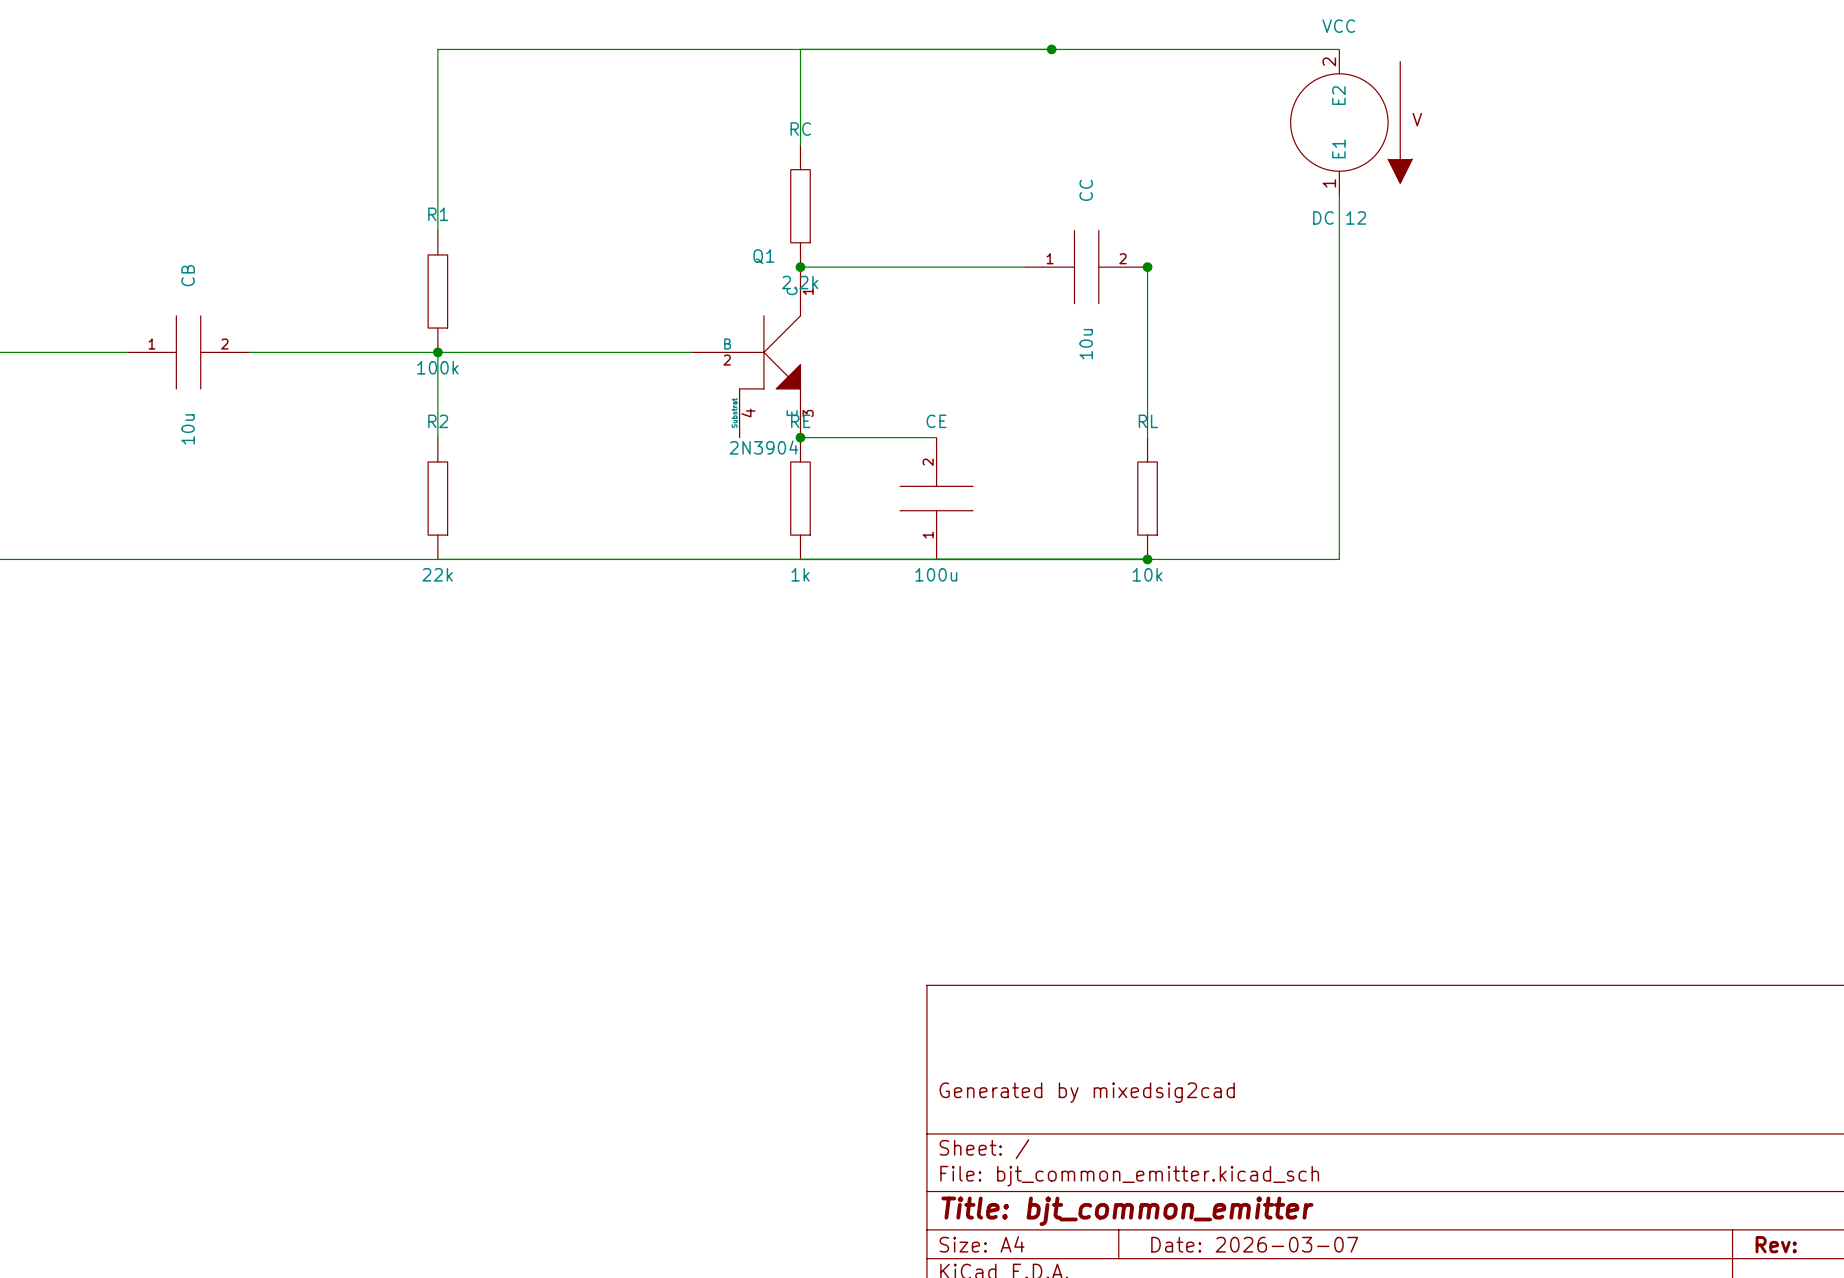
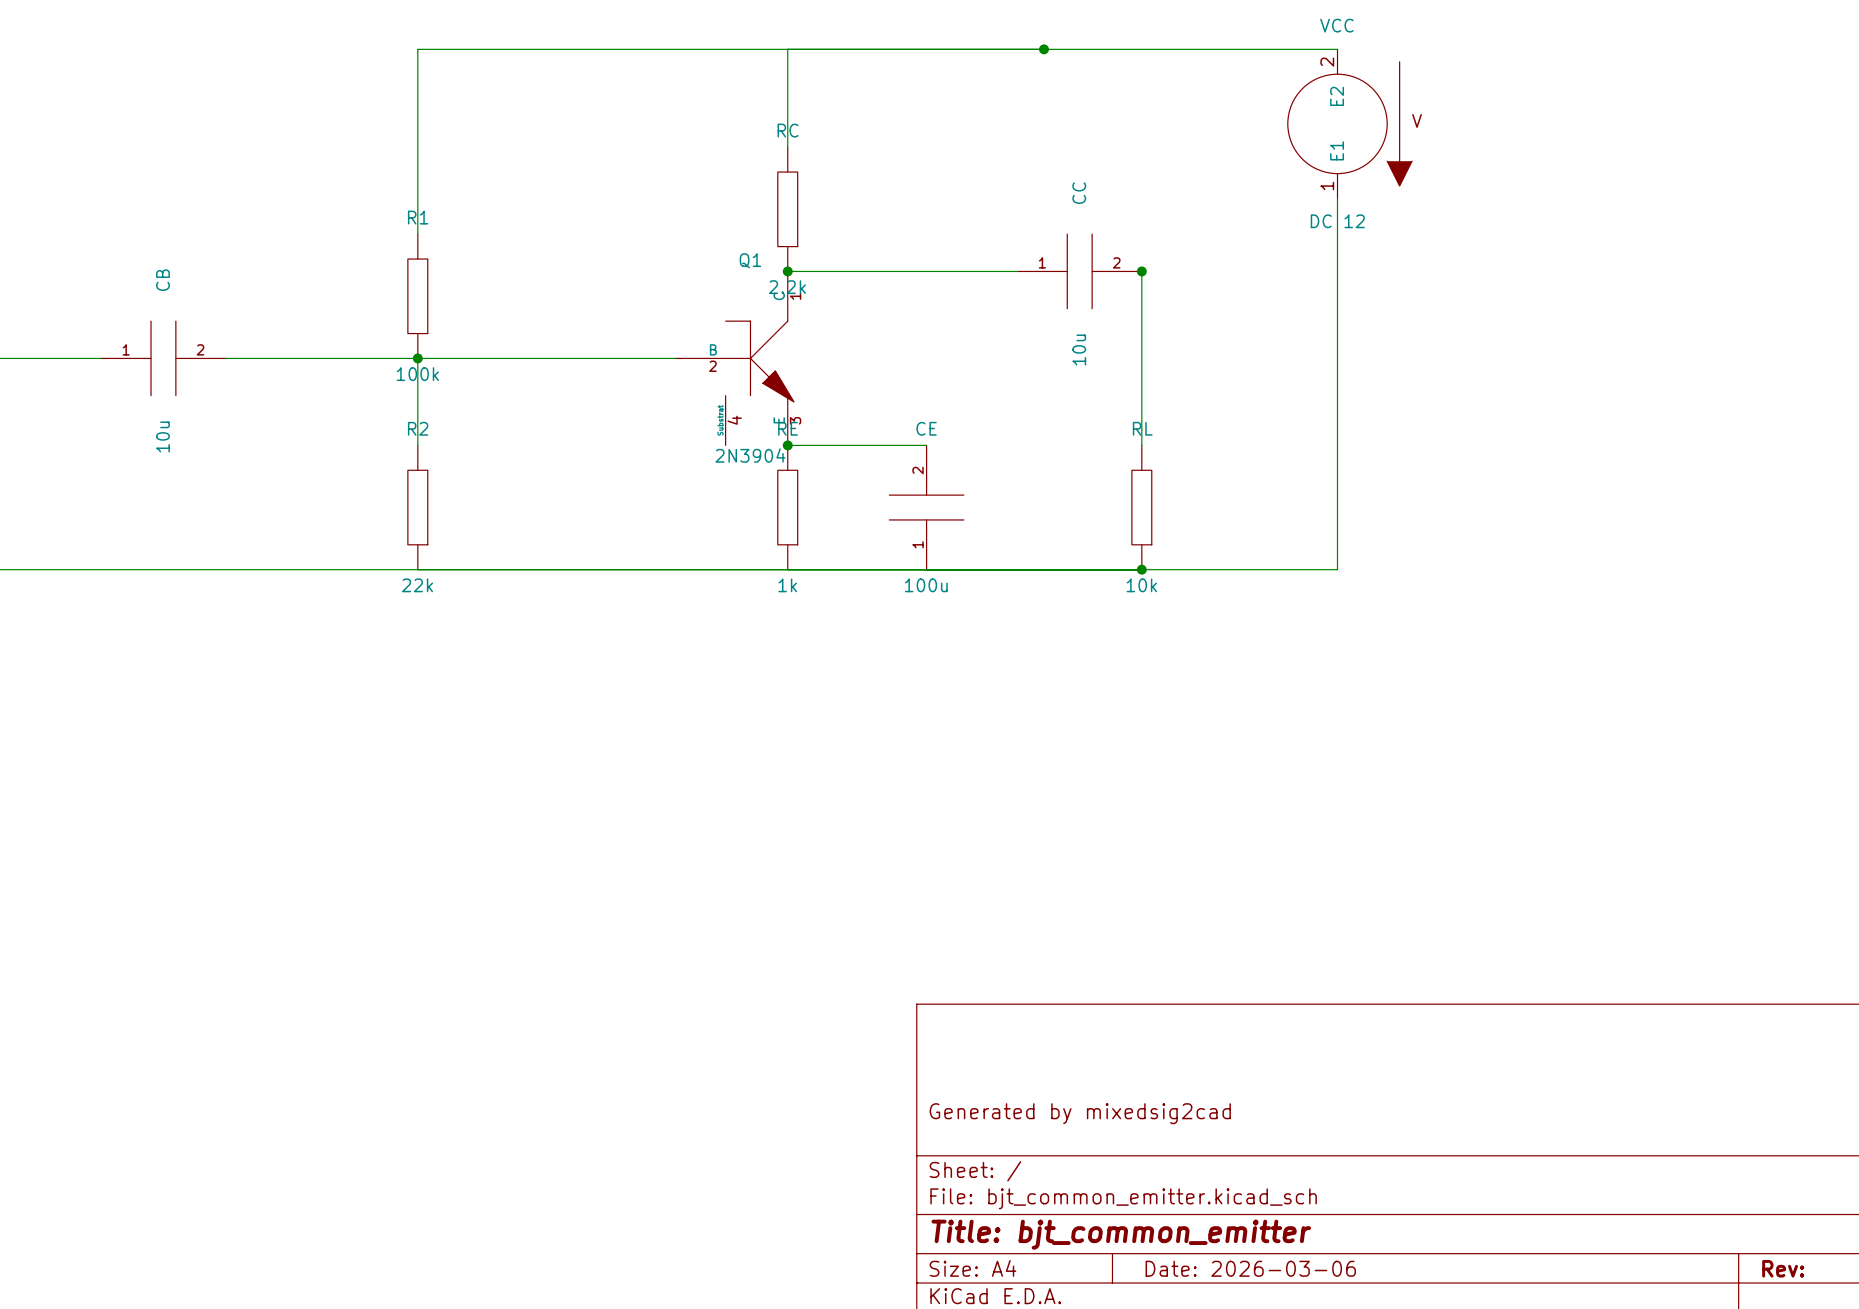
Q1 symbol: [690, 267, 801, 438] -> [675, 271, 795, 446]
title block: Date: 2026-03-07 (1254, 1244) -> Date: 2026-03-06 (1250, 1268)

